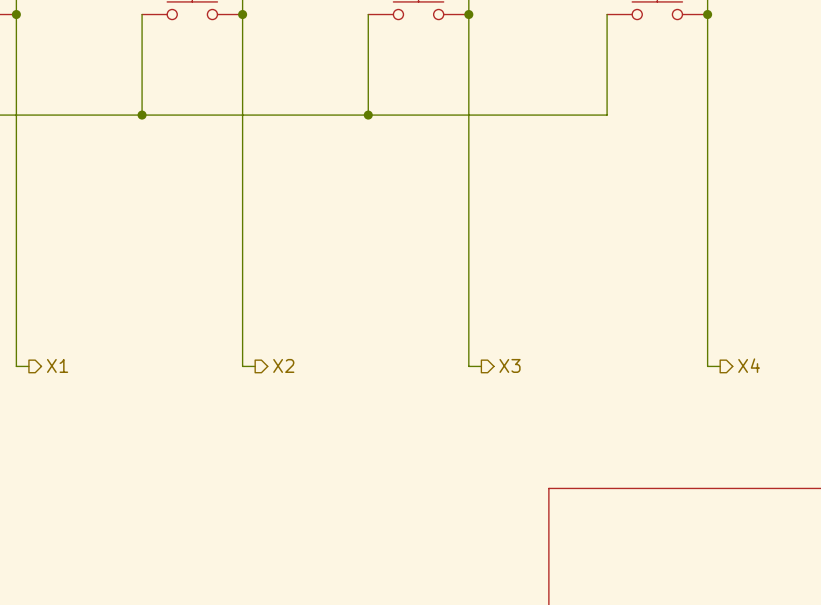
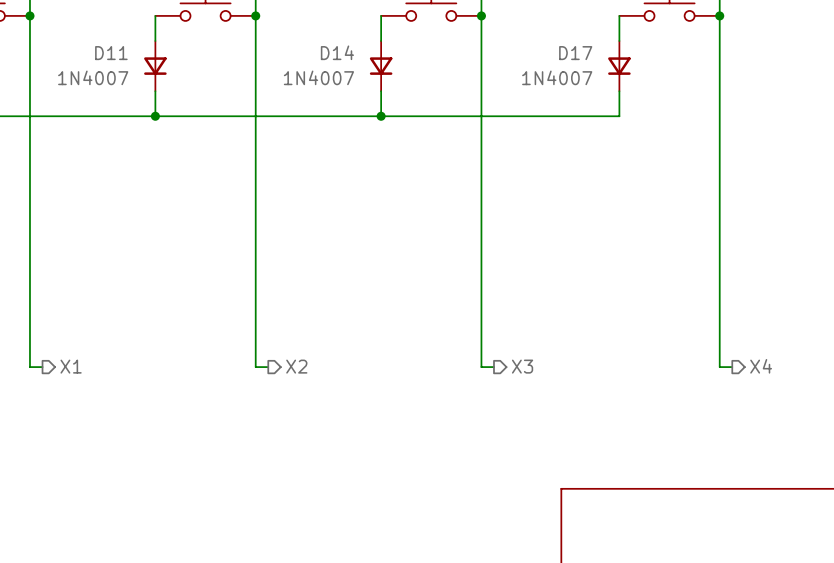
D11: none -> 1N4007 (155, 66)
D14: none -> 1N4007 (381, 66)
D17: none -> 1N4007 (619, 66)

